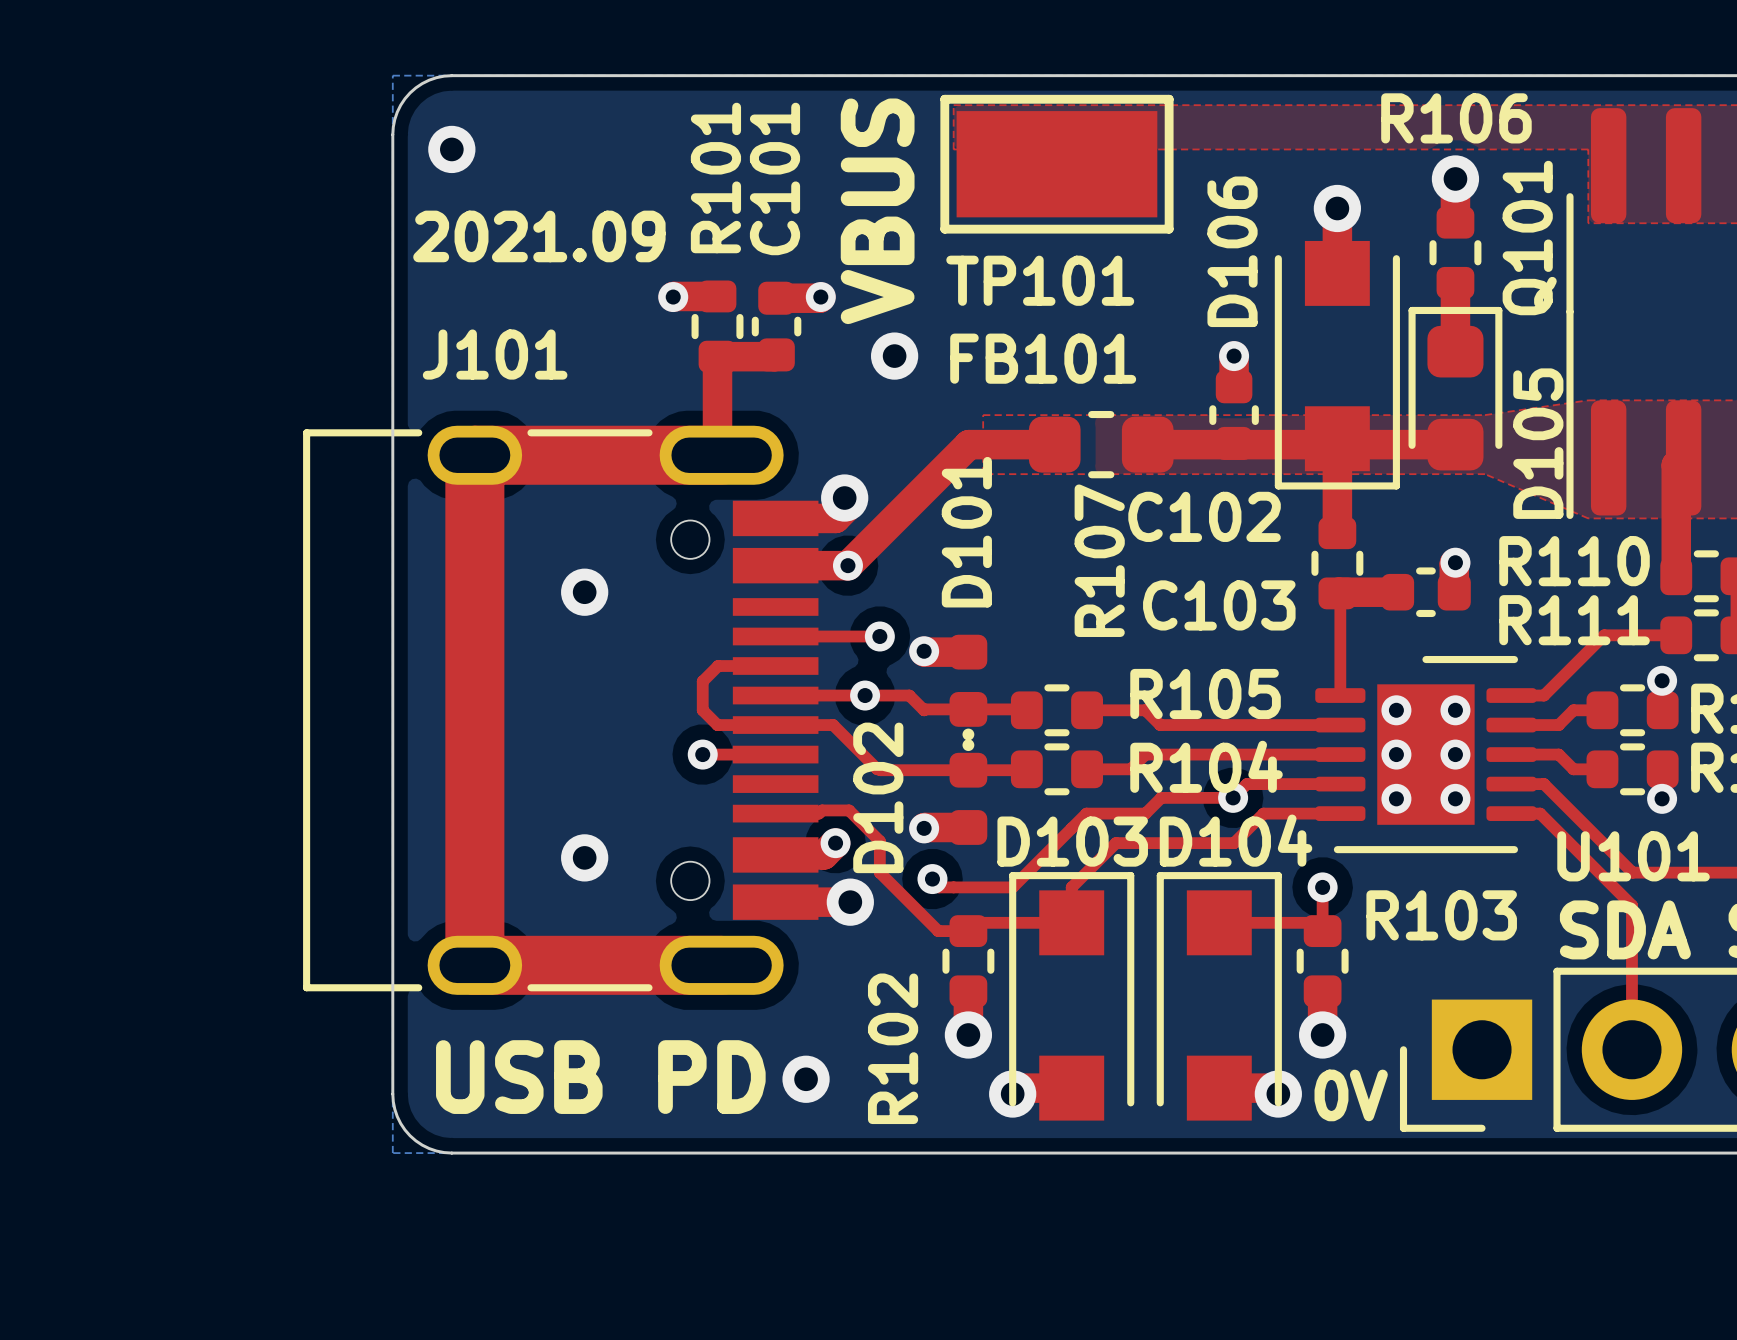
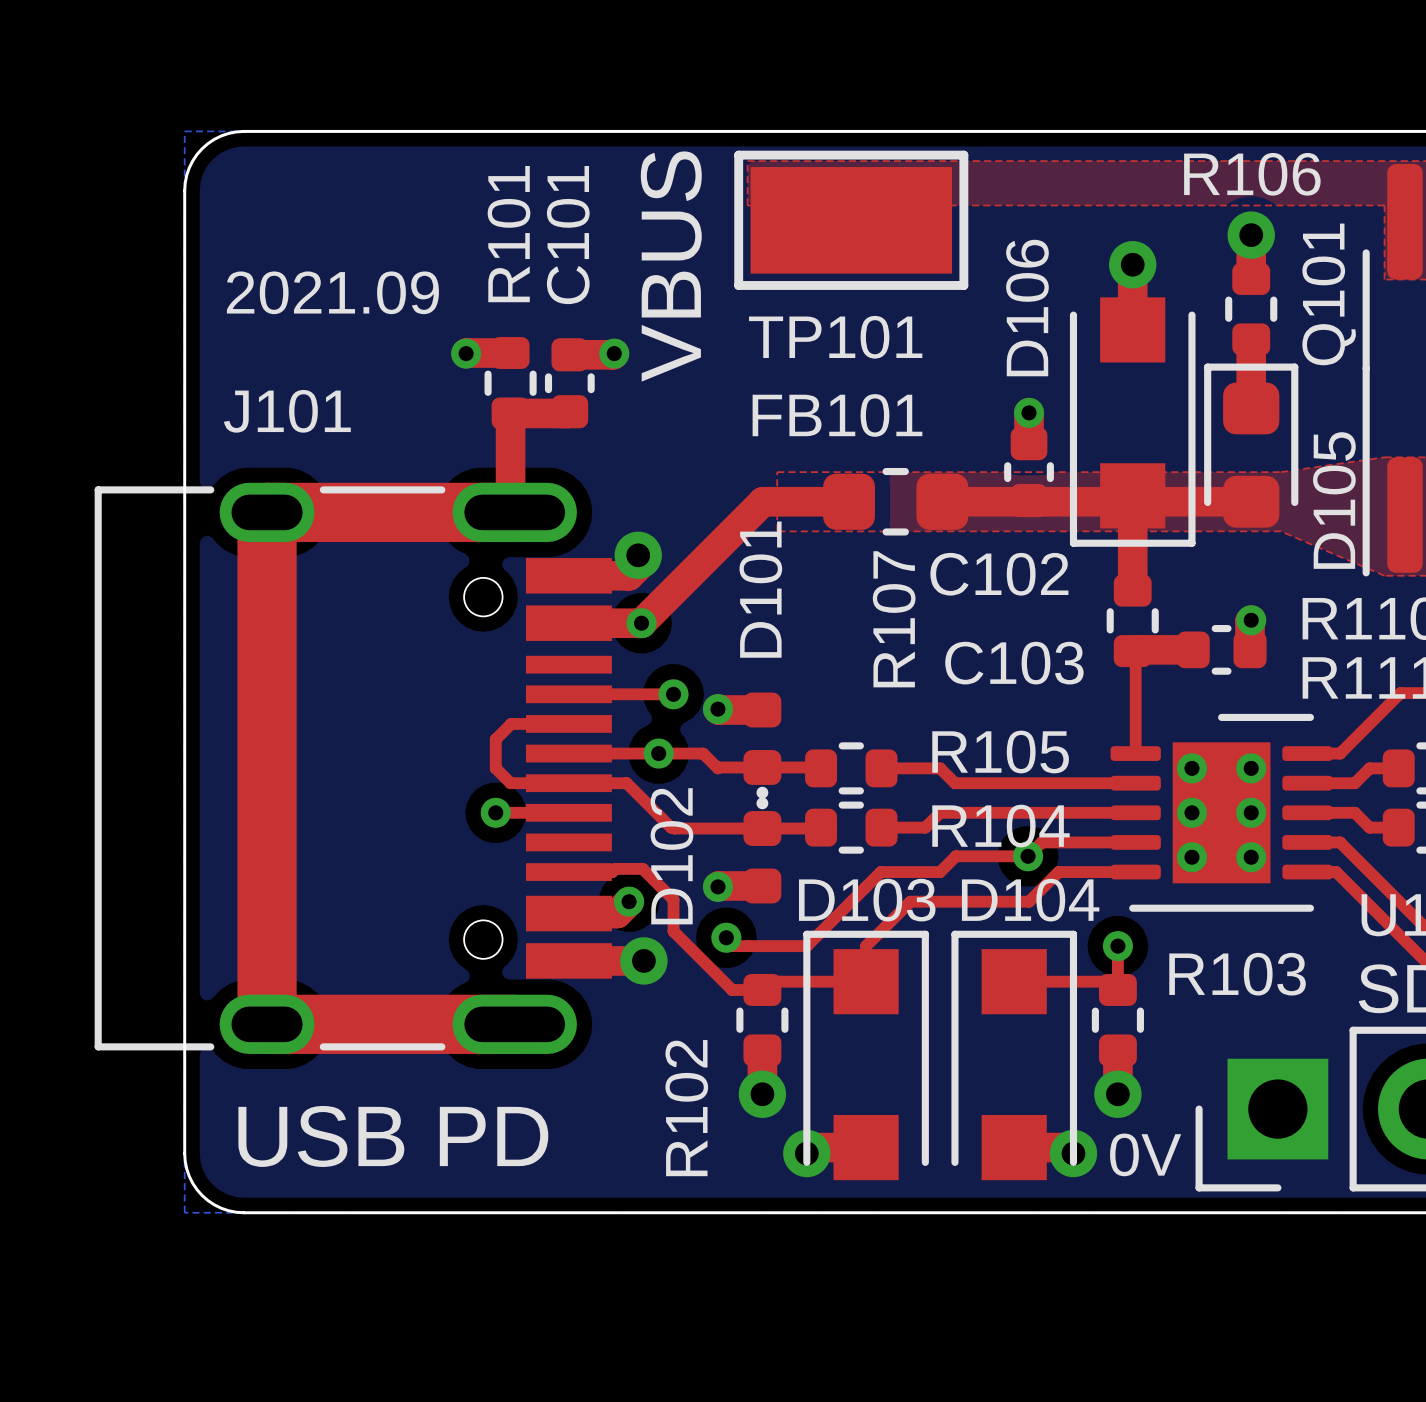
via: (451, 149) -> none
via: (894, 356) -> none
via: (584, 592) -> none
via: (584, 857) -> none
via: (806, 1079) -> none

